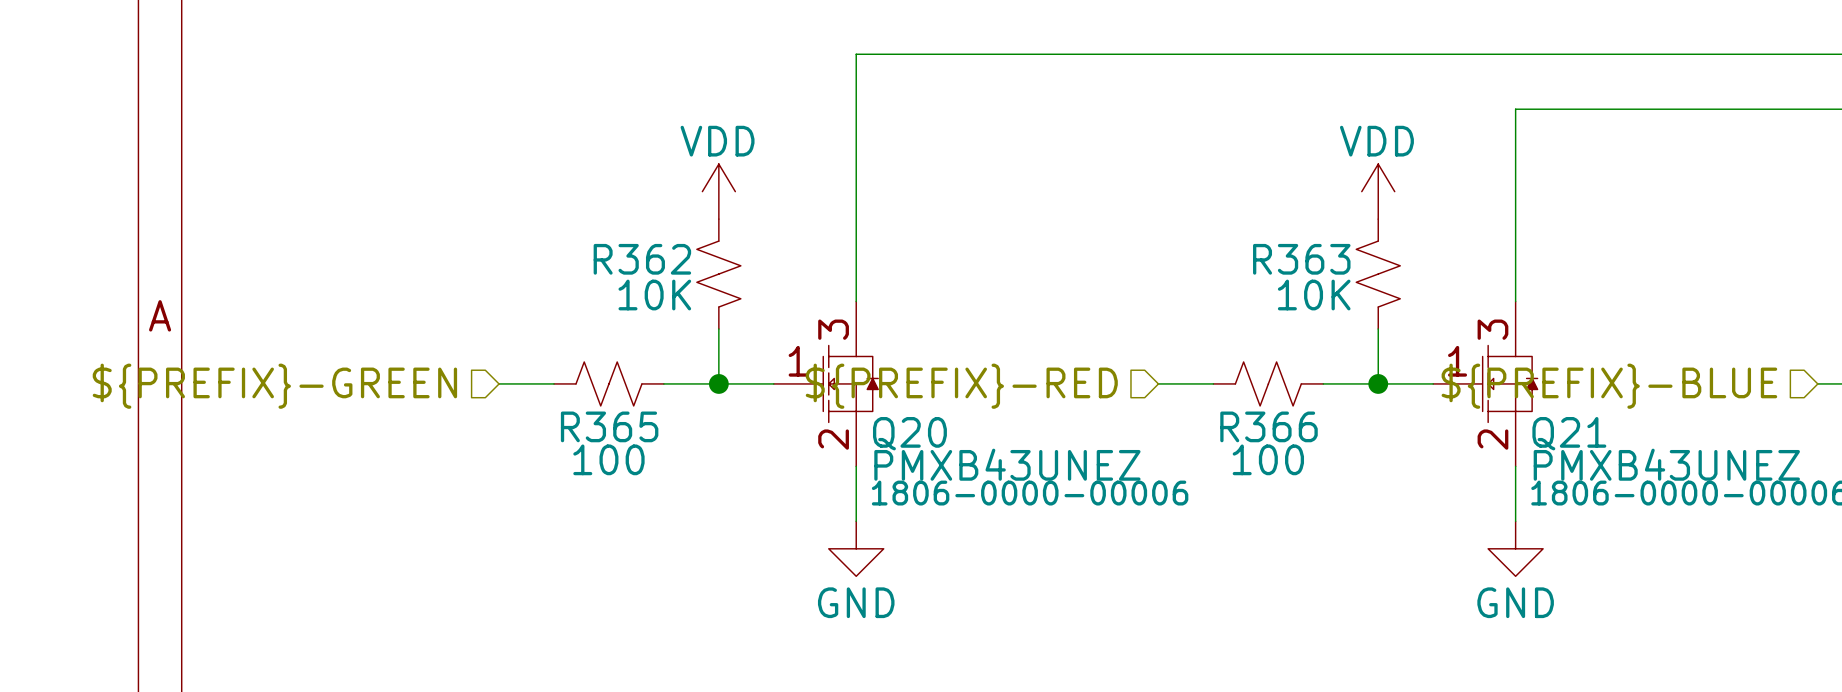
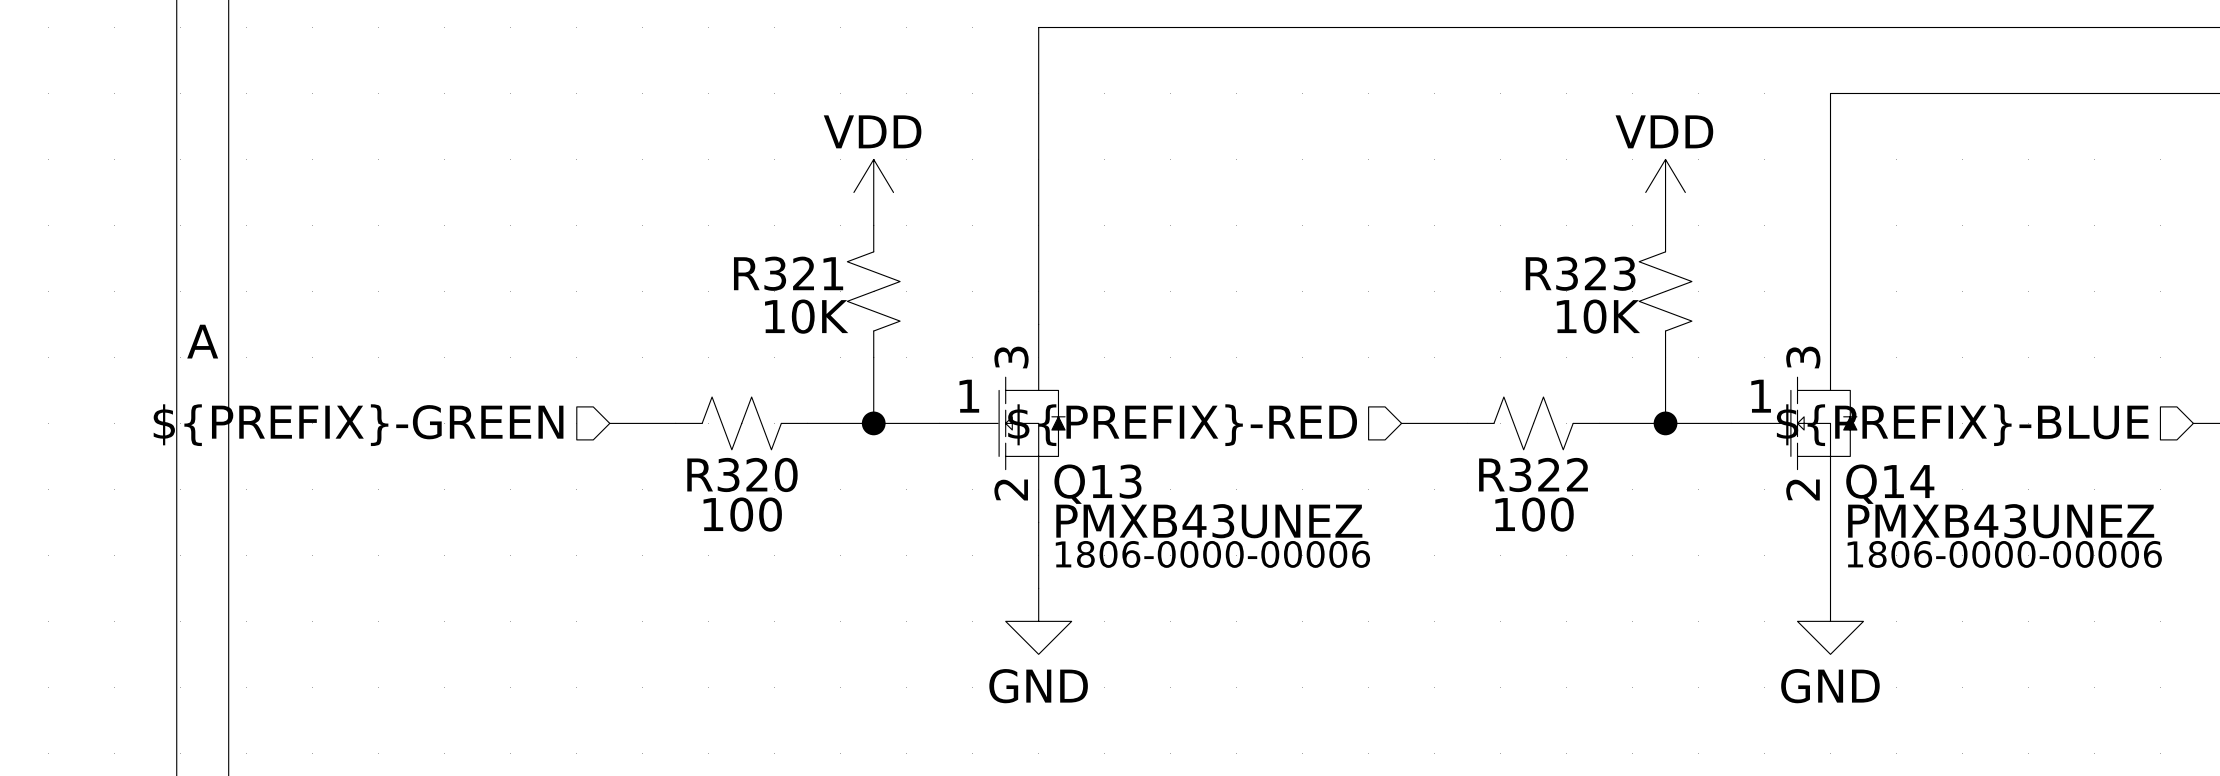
R362 name: R362 (642, 259) -> R321 (788, 273)
R363 name: R363 (1301, 259) -> R323 (1580, 273)
R365 name: R365 (609, 426) -> R320 (742, 474)
R366 name: R366 (1269, 426) -> R322 (1533, 474)
Q20 name: Q20 (909, 433) -> Q13 (1097, 484)
Q21 name: Q21 (1569, 433) -> Q14 (1890, 484)

